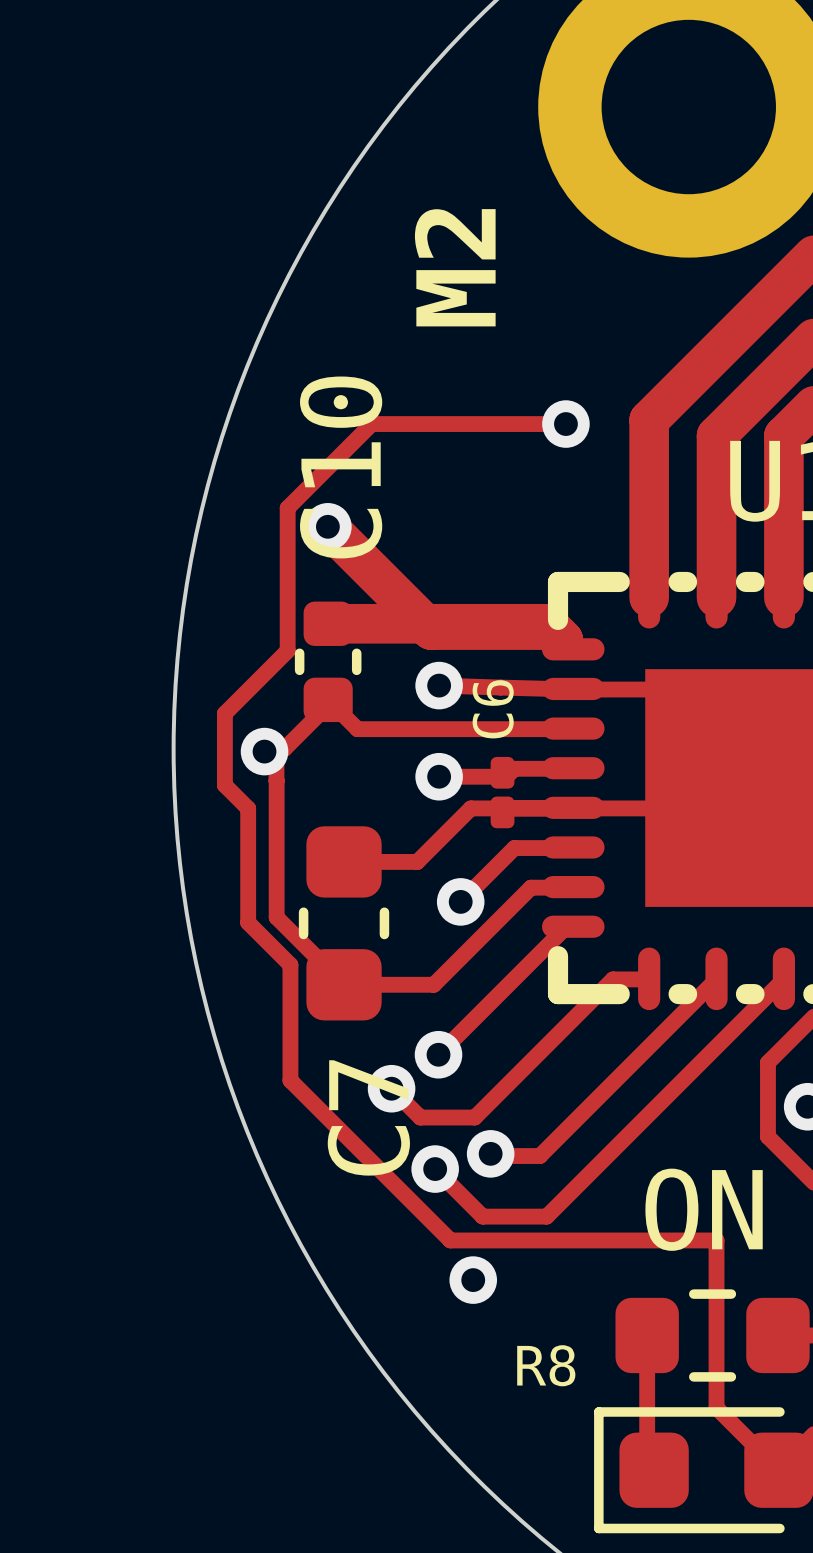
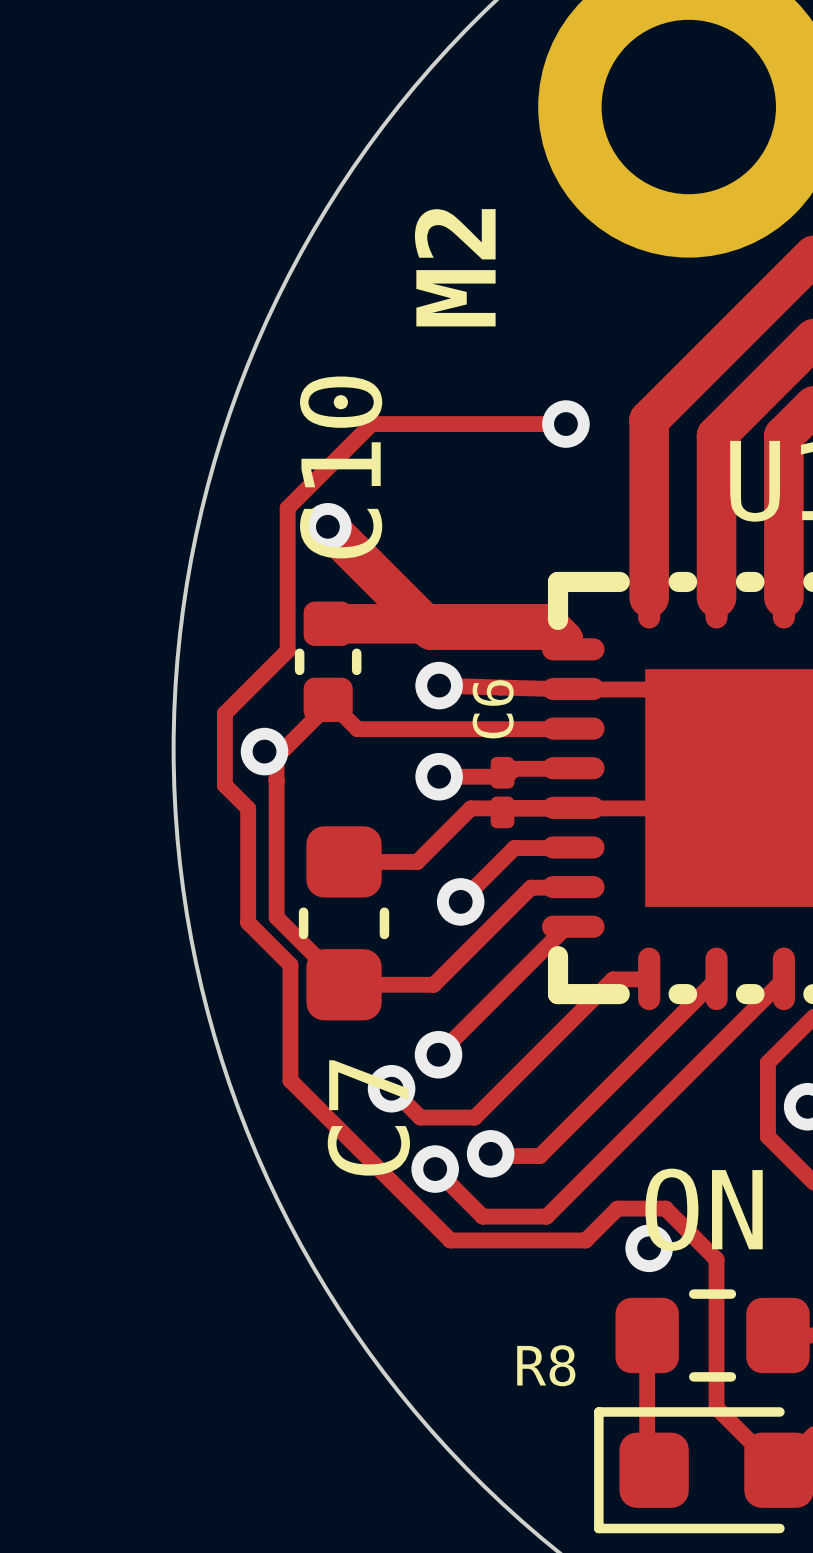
track: (585, 1240) (716, 1240) (716, 1259) -> (585, 1240) (617, 1208) (665, 1208) (716, 1259)
via position: (473, 1280) -> (649, 1248)

